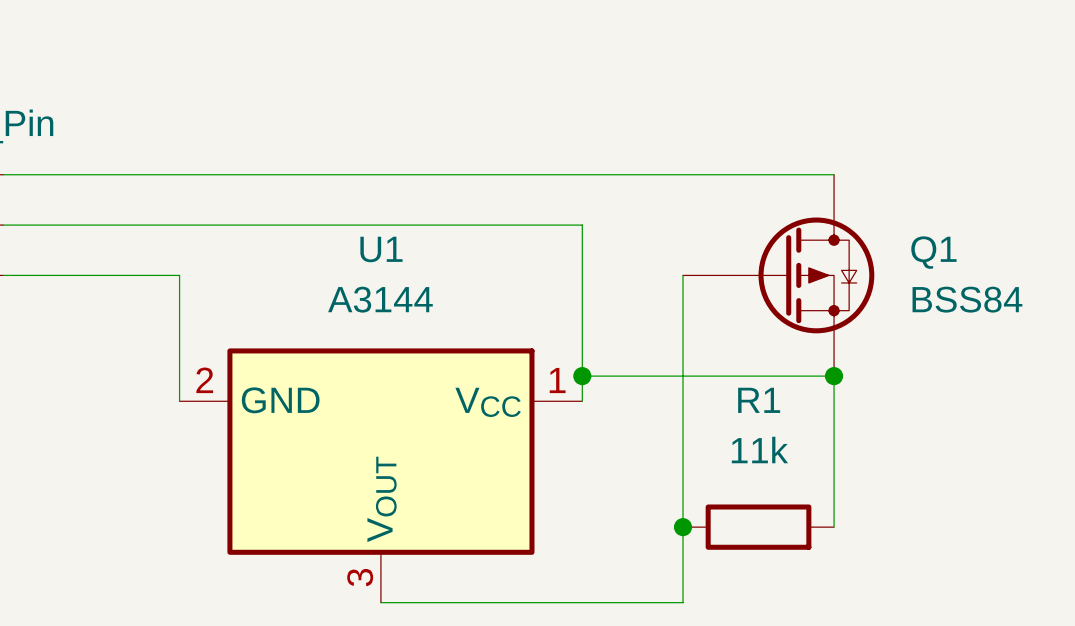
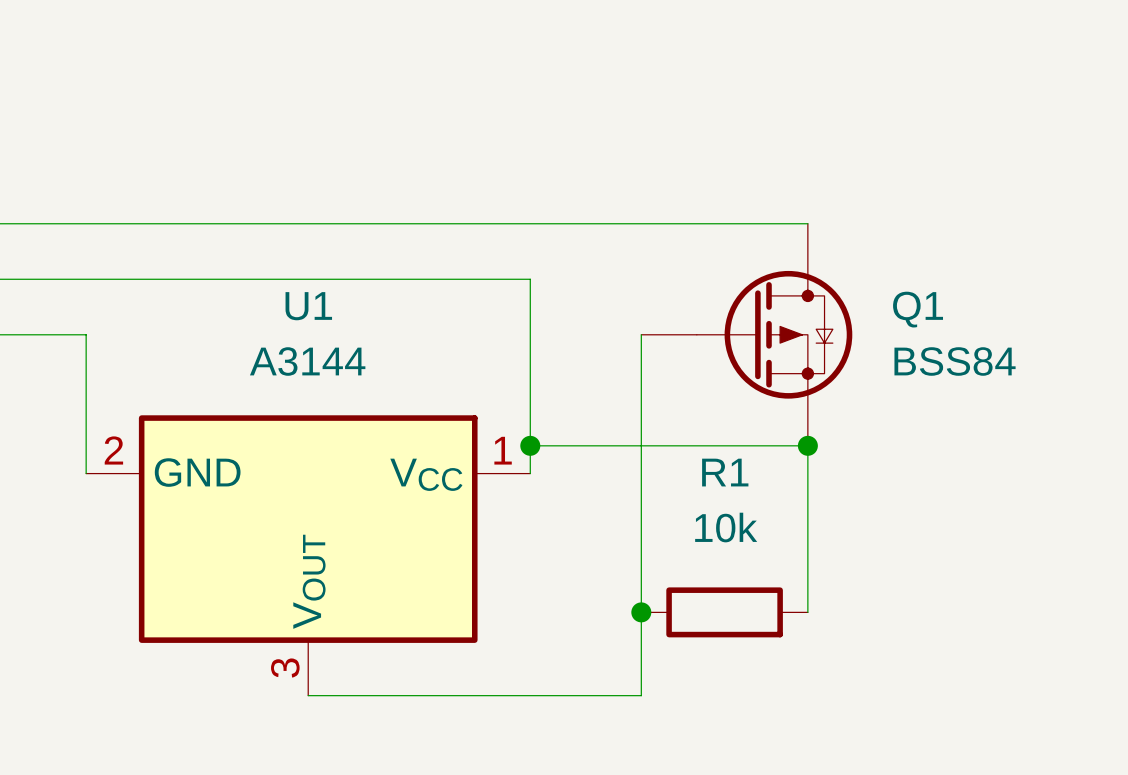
R1 value: 11k (759, 450) -> 10k (726, 527)

